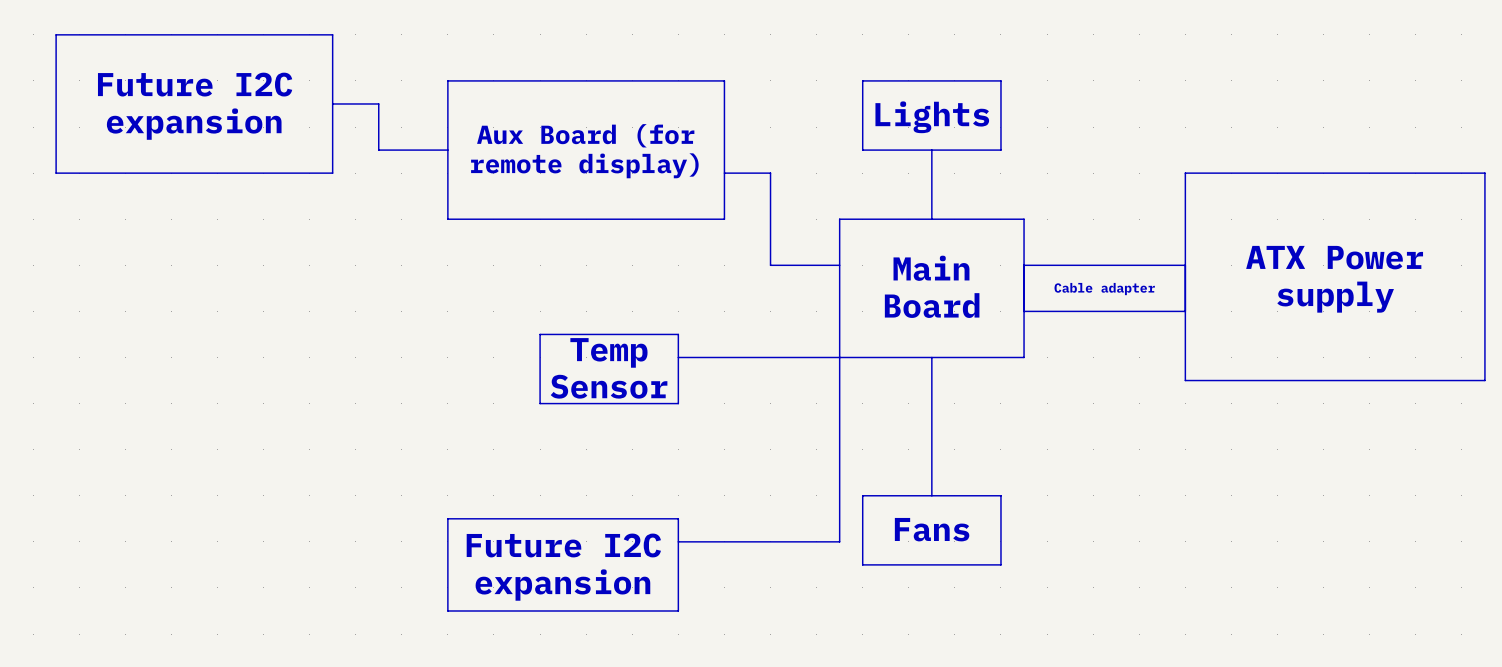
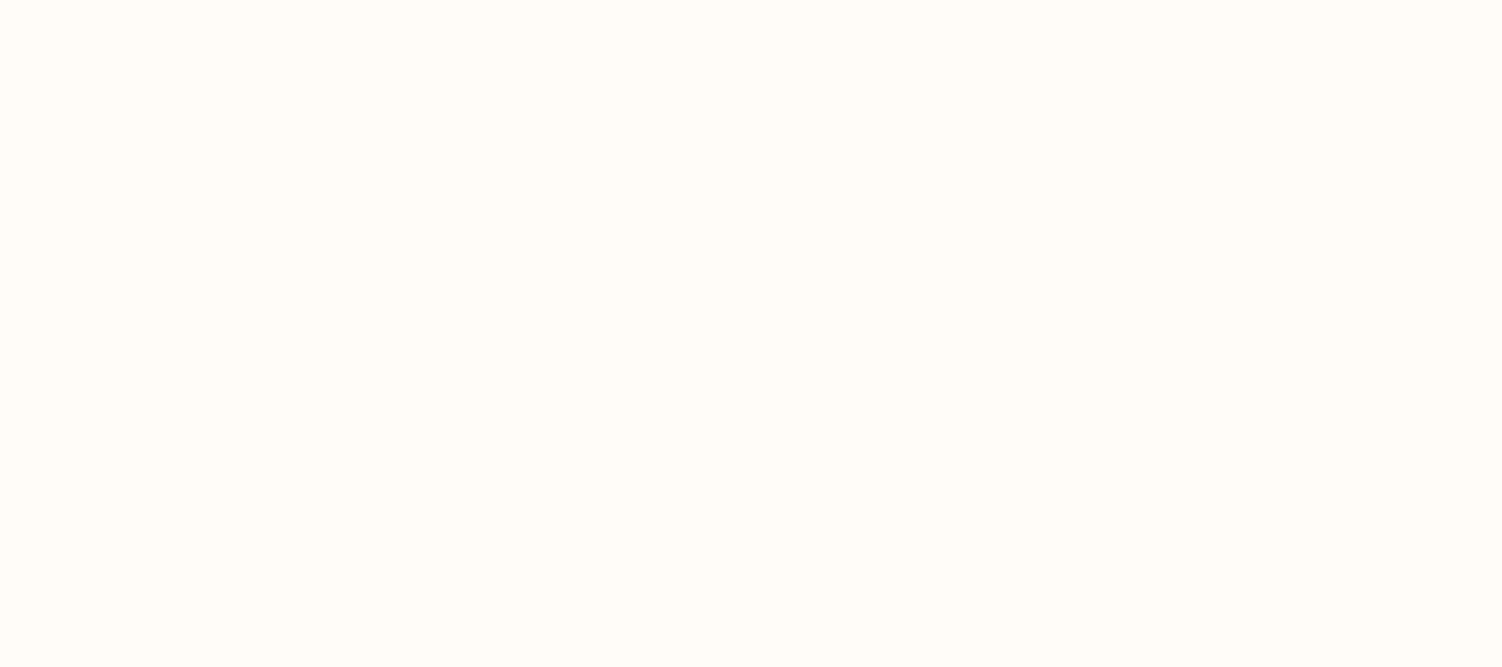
line: (56, 34) (332, 34) (332, 173) (56, 173) (56, 34) -> none
line: (447, 80) (724, 80) (724, 219) (447, 219) (447, 80) -> none
line: (862, 80) (1000, 80) (1000, 150) (862, 150) (862, 80) -> none
text: Future I2C (195, 84) -> none
line: (332, 103) (378, 103) (378, 150) (447, 150) -> none
text: Lights (932, 117) -> none
text: expansion (194, 124) -> none
text: Aux Board (for (585, 135) -> none
line: (931, 150) (931, 219) -> none
text: remote display) (584, 165) -> none
line: (724, 173) (770, 173) (770, 265) (839, 265) -> none
line: (1185, 173) (1484, 173) (1484, 380) (1185, 380) (1185, 173) -> none
text: ATX Power (1334, 257) -> none
line: (1024, 265) (1185, 265) -> none
text: Main (931, 268) -> none
text: Cable adapter (1104, 289) -> none
text: supply (1335, 297) -> none
text: Board (932, 305) -> none
line: (1024, 311) (1185, 311) -> none
line: (540, 334) (678, 334) (678, 403) (540, 403) (540, 334) -> none
text: Temp (608, 352) -> none
line: (678, 357) (1024, 357) (1024, 219) (839, 219) (839, 541) (678, 541) -> none
line: (931, 357) (931, 495) -> none
text: Sensor (609, 386) -> none
line: (862, 495) (1000, 495) (1000, 564) (862, 564) (862, 495) -> none
line: (447, 518) (447, 610) (678, 610) (678, 518) (447, 518) -> none
text: Fans (932, 529) -> none
text: Future I2C (563, 545) -> none
text: expansion (562, 585) -> none

